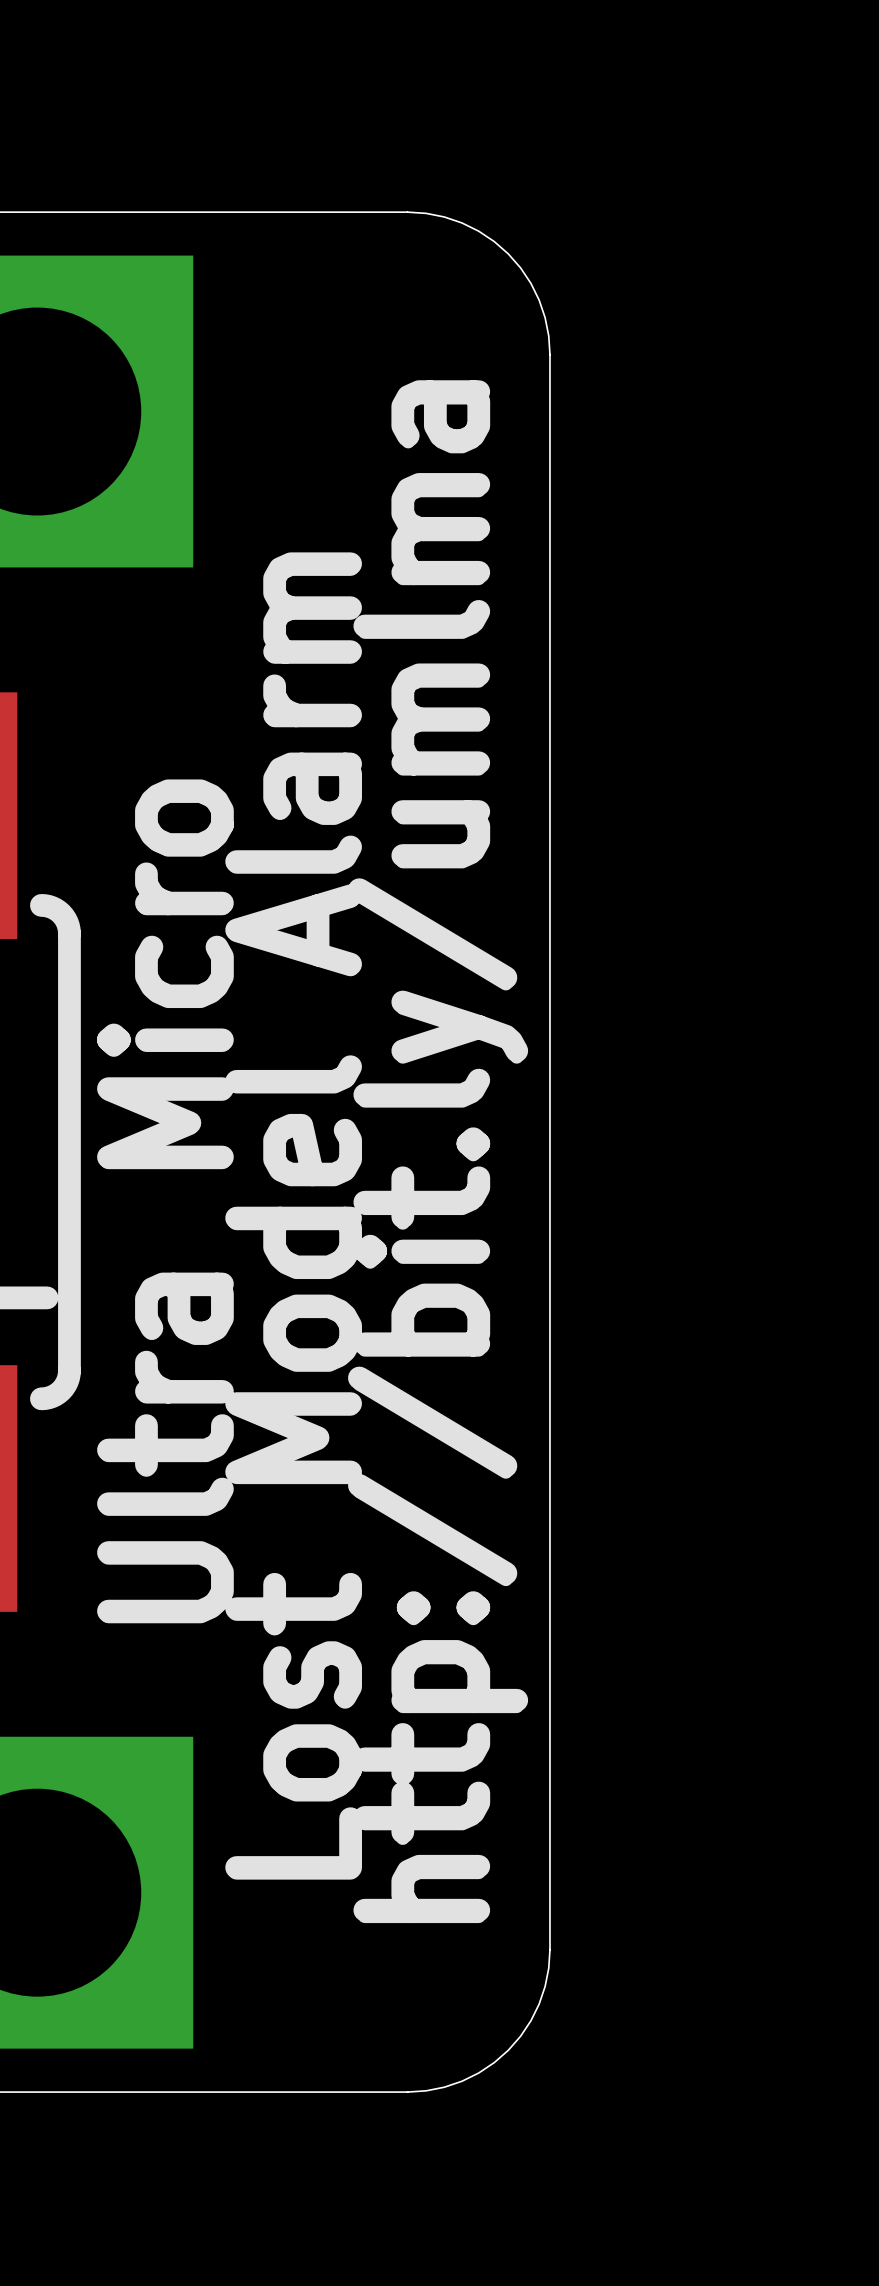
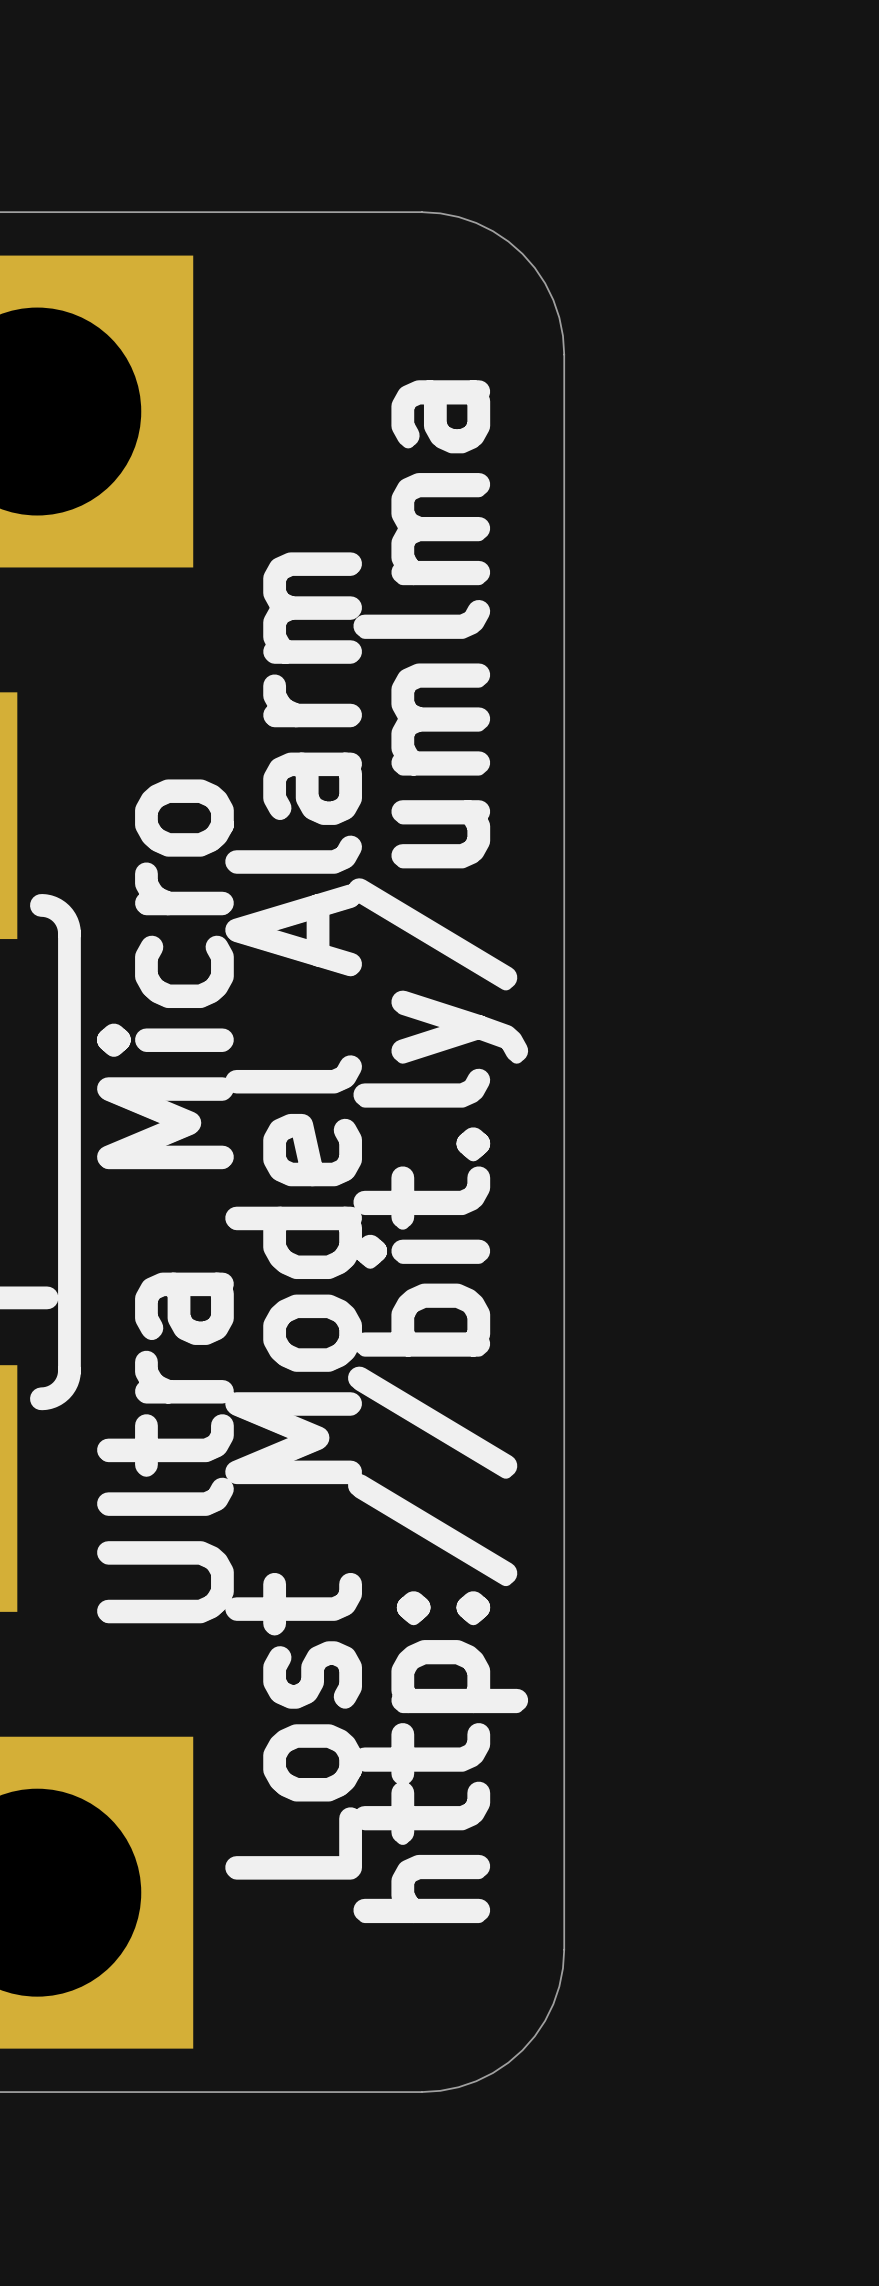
board edge: (407, 212) (444, 217) (462, 222) (478, 231) (508, 253) (530, 283) (539, 300) (545, 317) (549, 354) (548, 1968) (545, 1986) (530, 2020) (520, 2036) (494, 2062) (478, 2072) (444, 2087) (407, 2092) -> (407, 212) (440, 213) (476, 222) (493, 231) (522, 253) (545, 283) (553, 300) (559, 317) (564, 354) (563, 1968) (559, 1986) (545, 2020) (534, 2036) (508, 2062) (493, 2072) (458, 2087) (440, 2090) (407, 2092)

